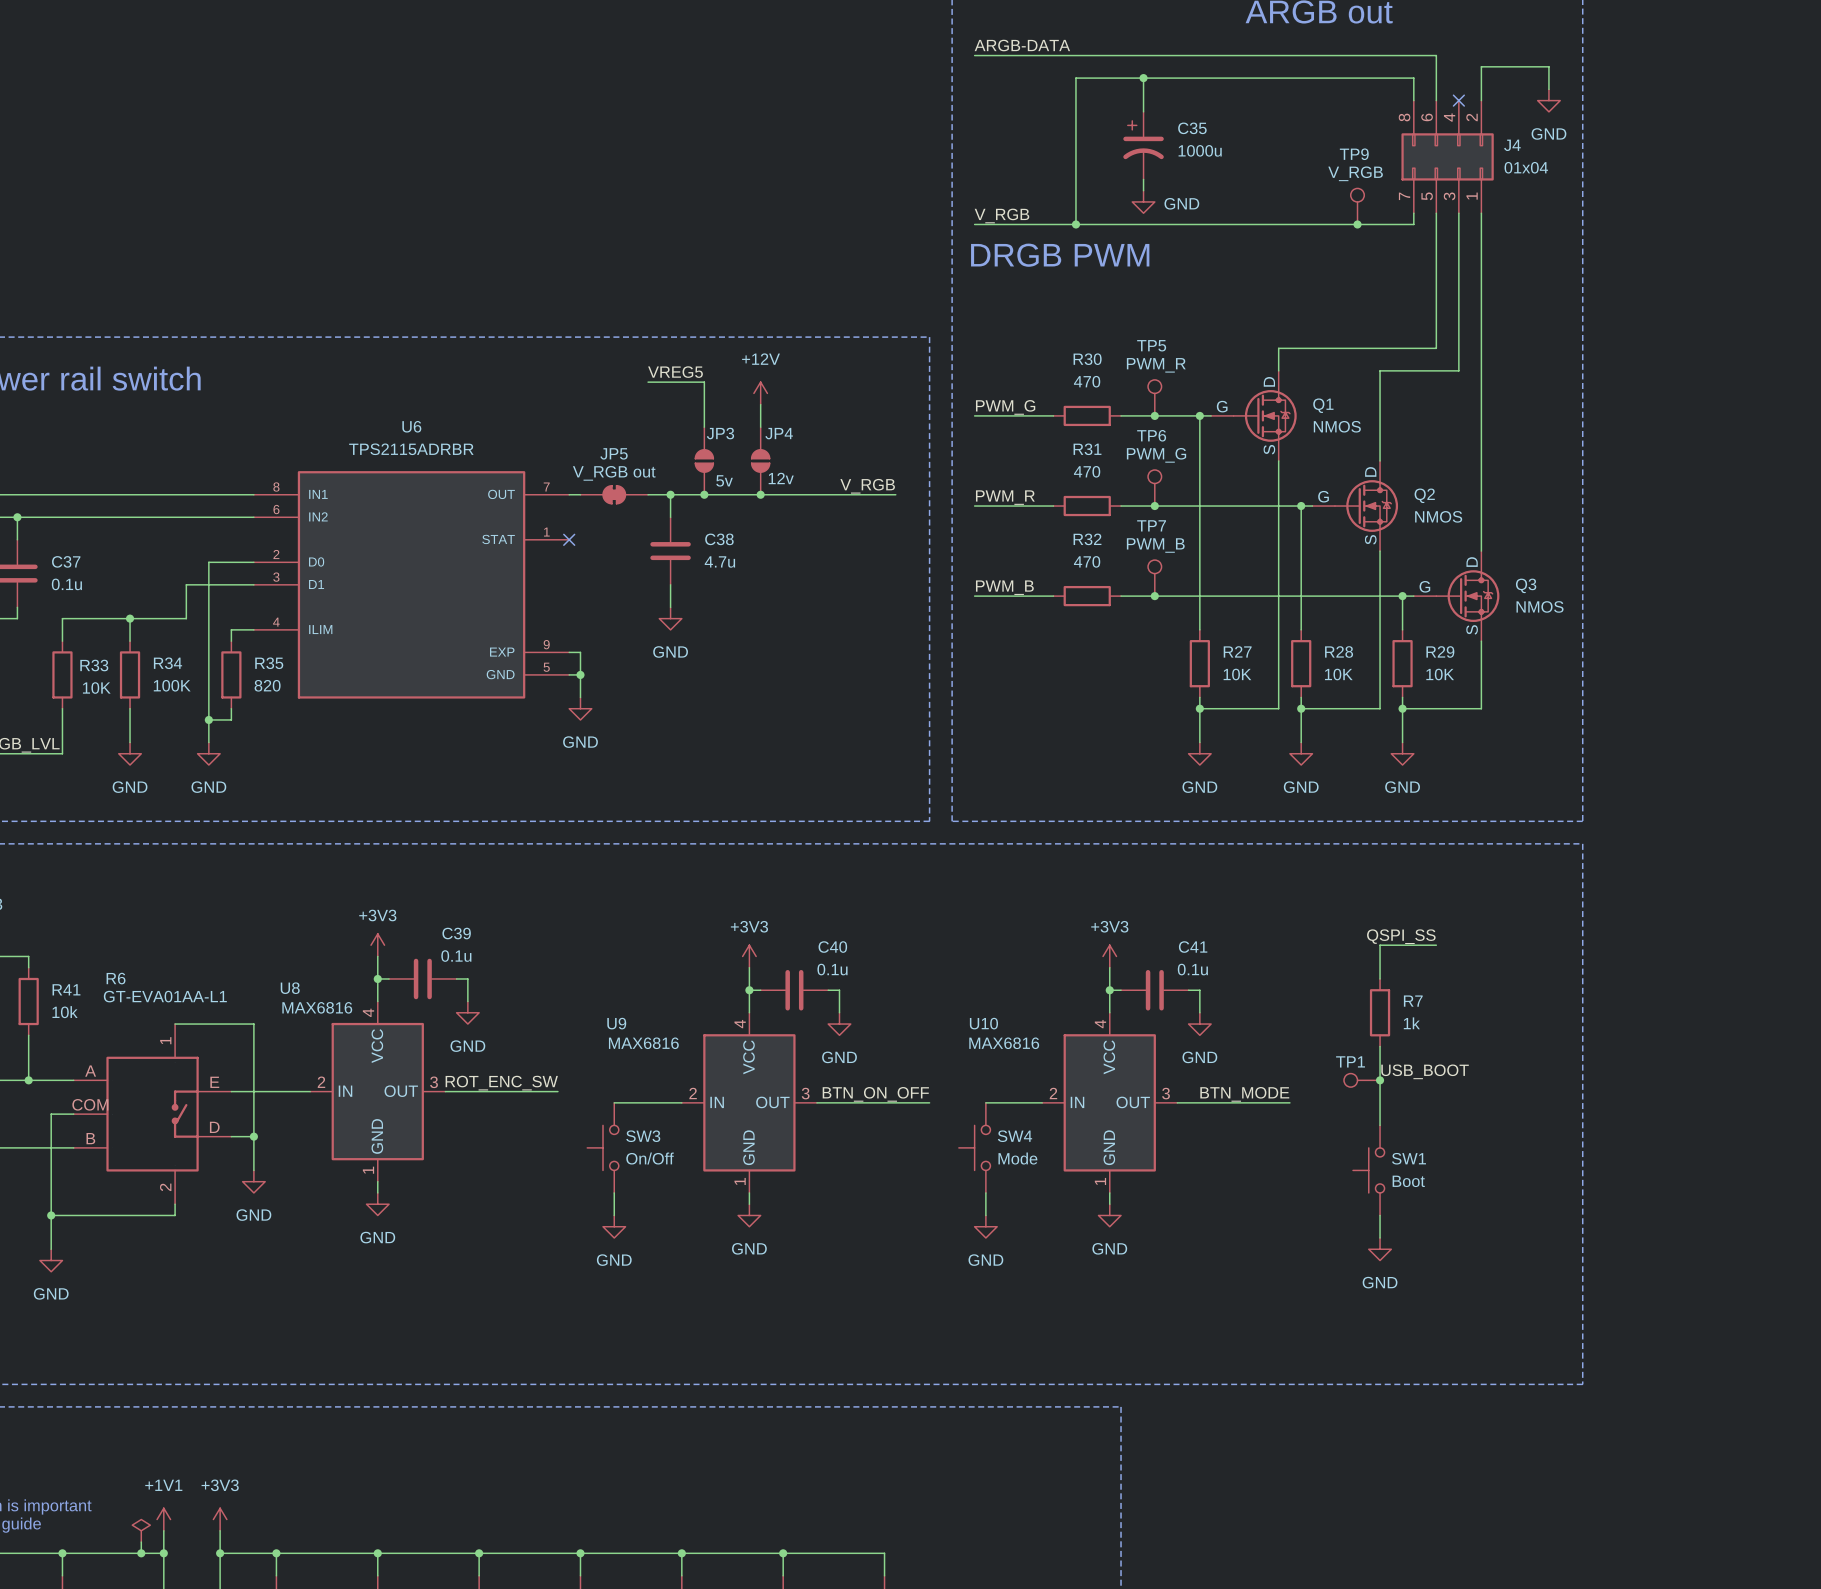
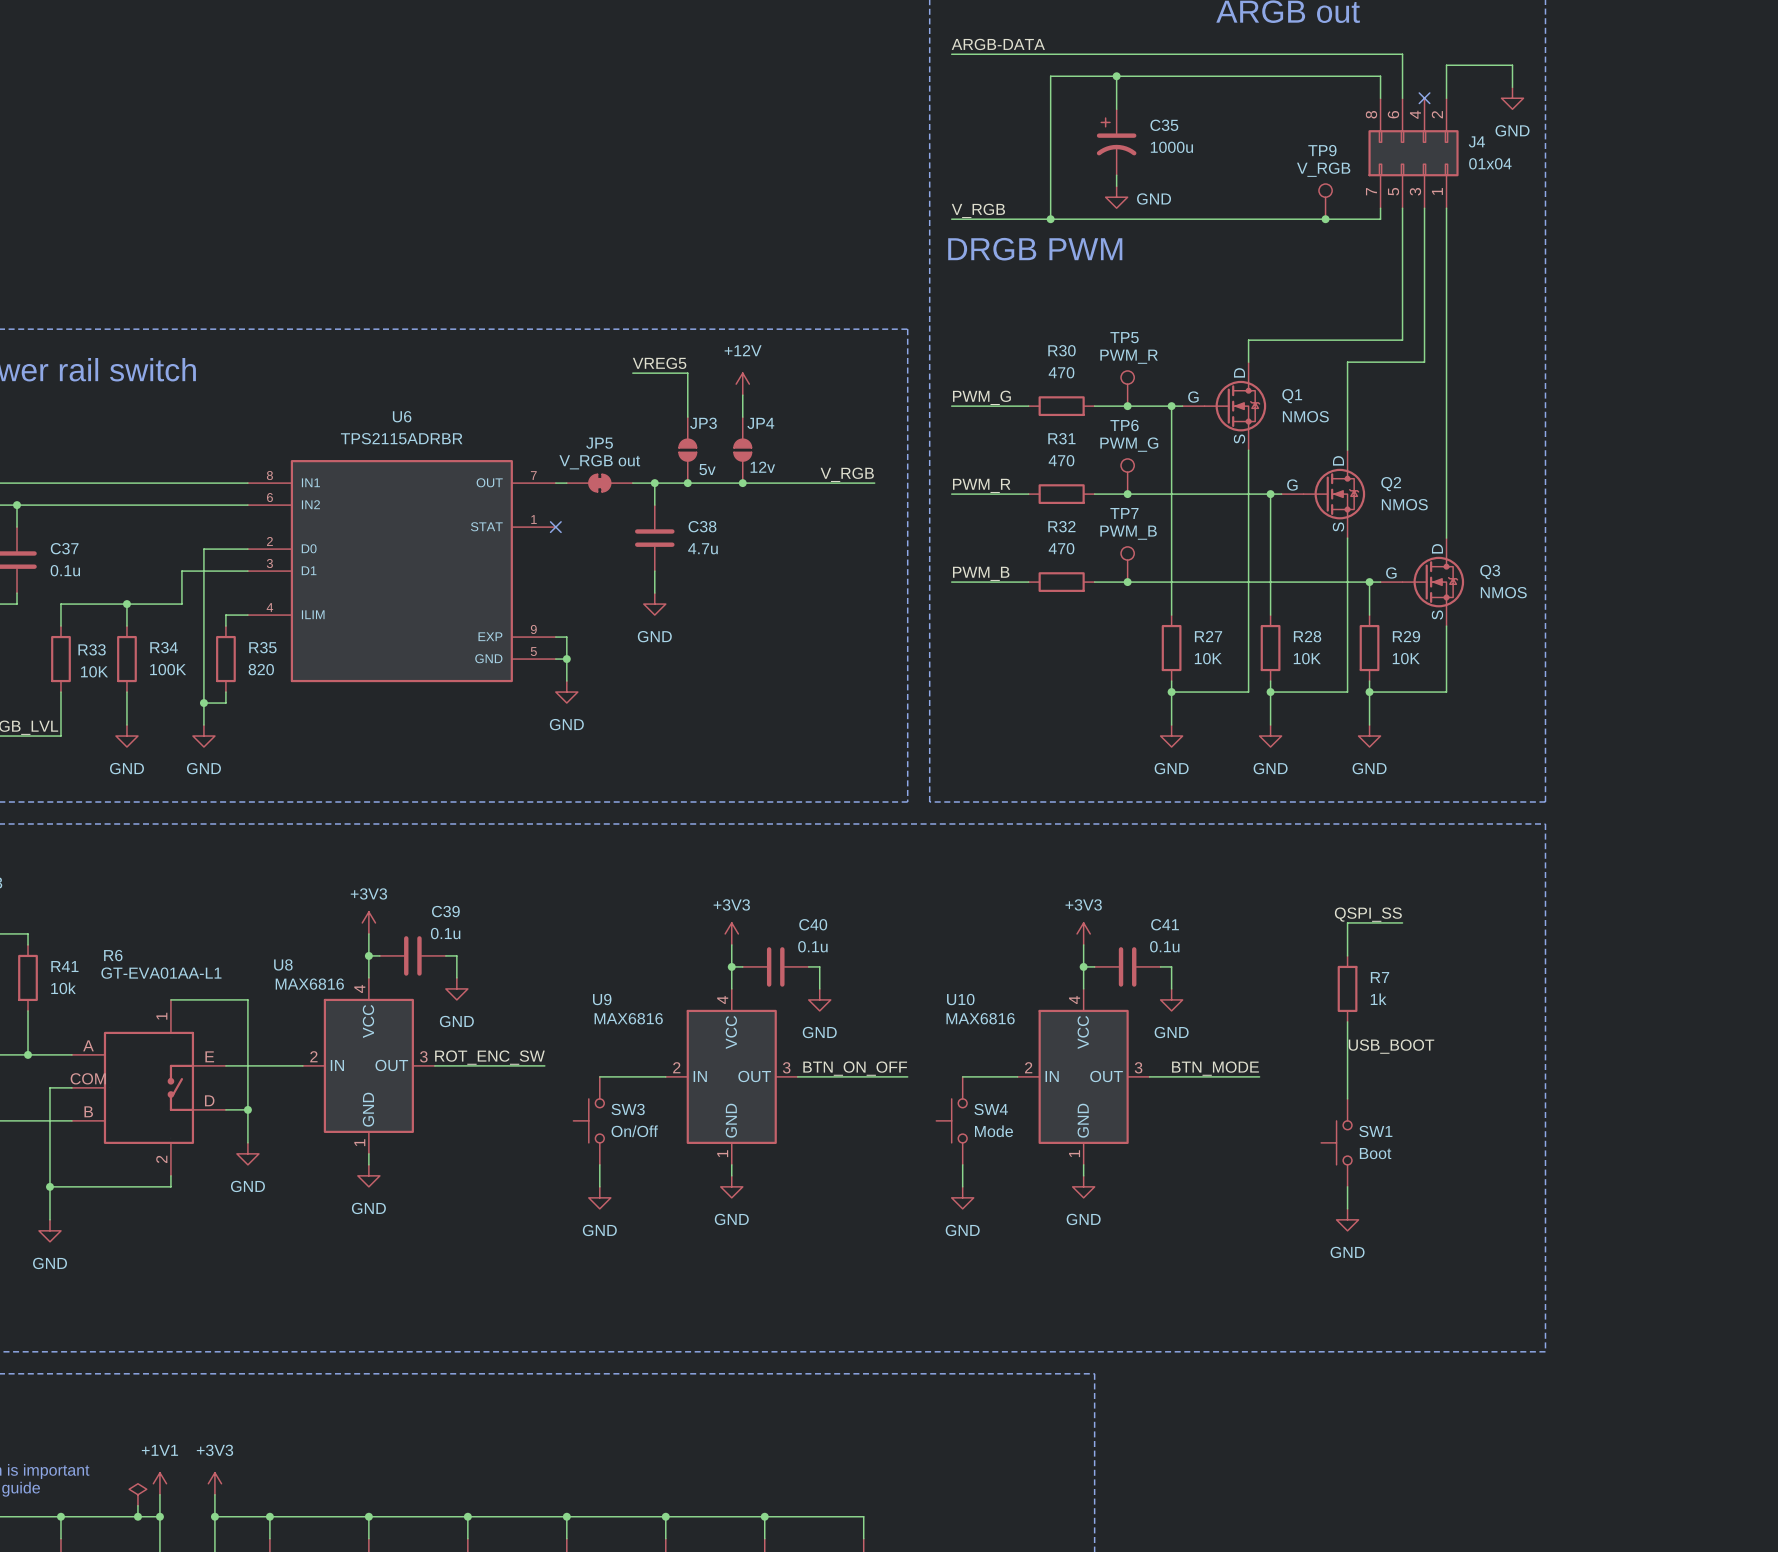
TP1: (1362, 1080) -> none
junction: (1380, 1080) -> none

